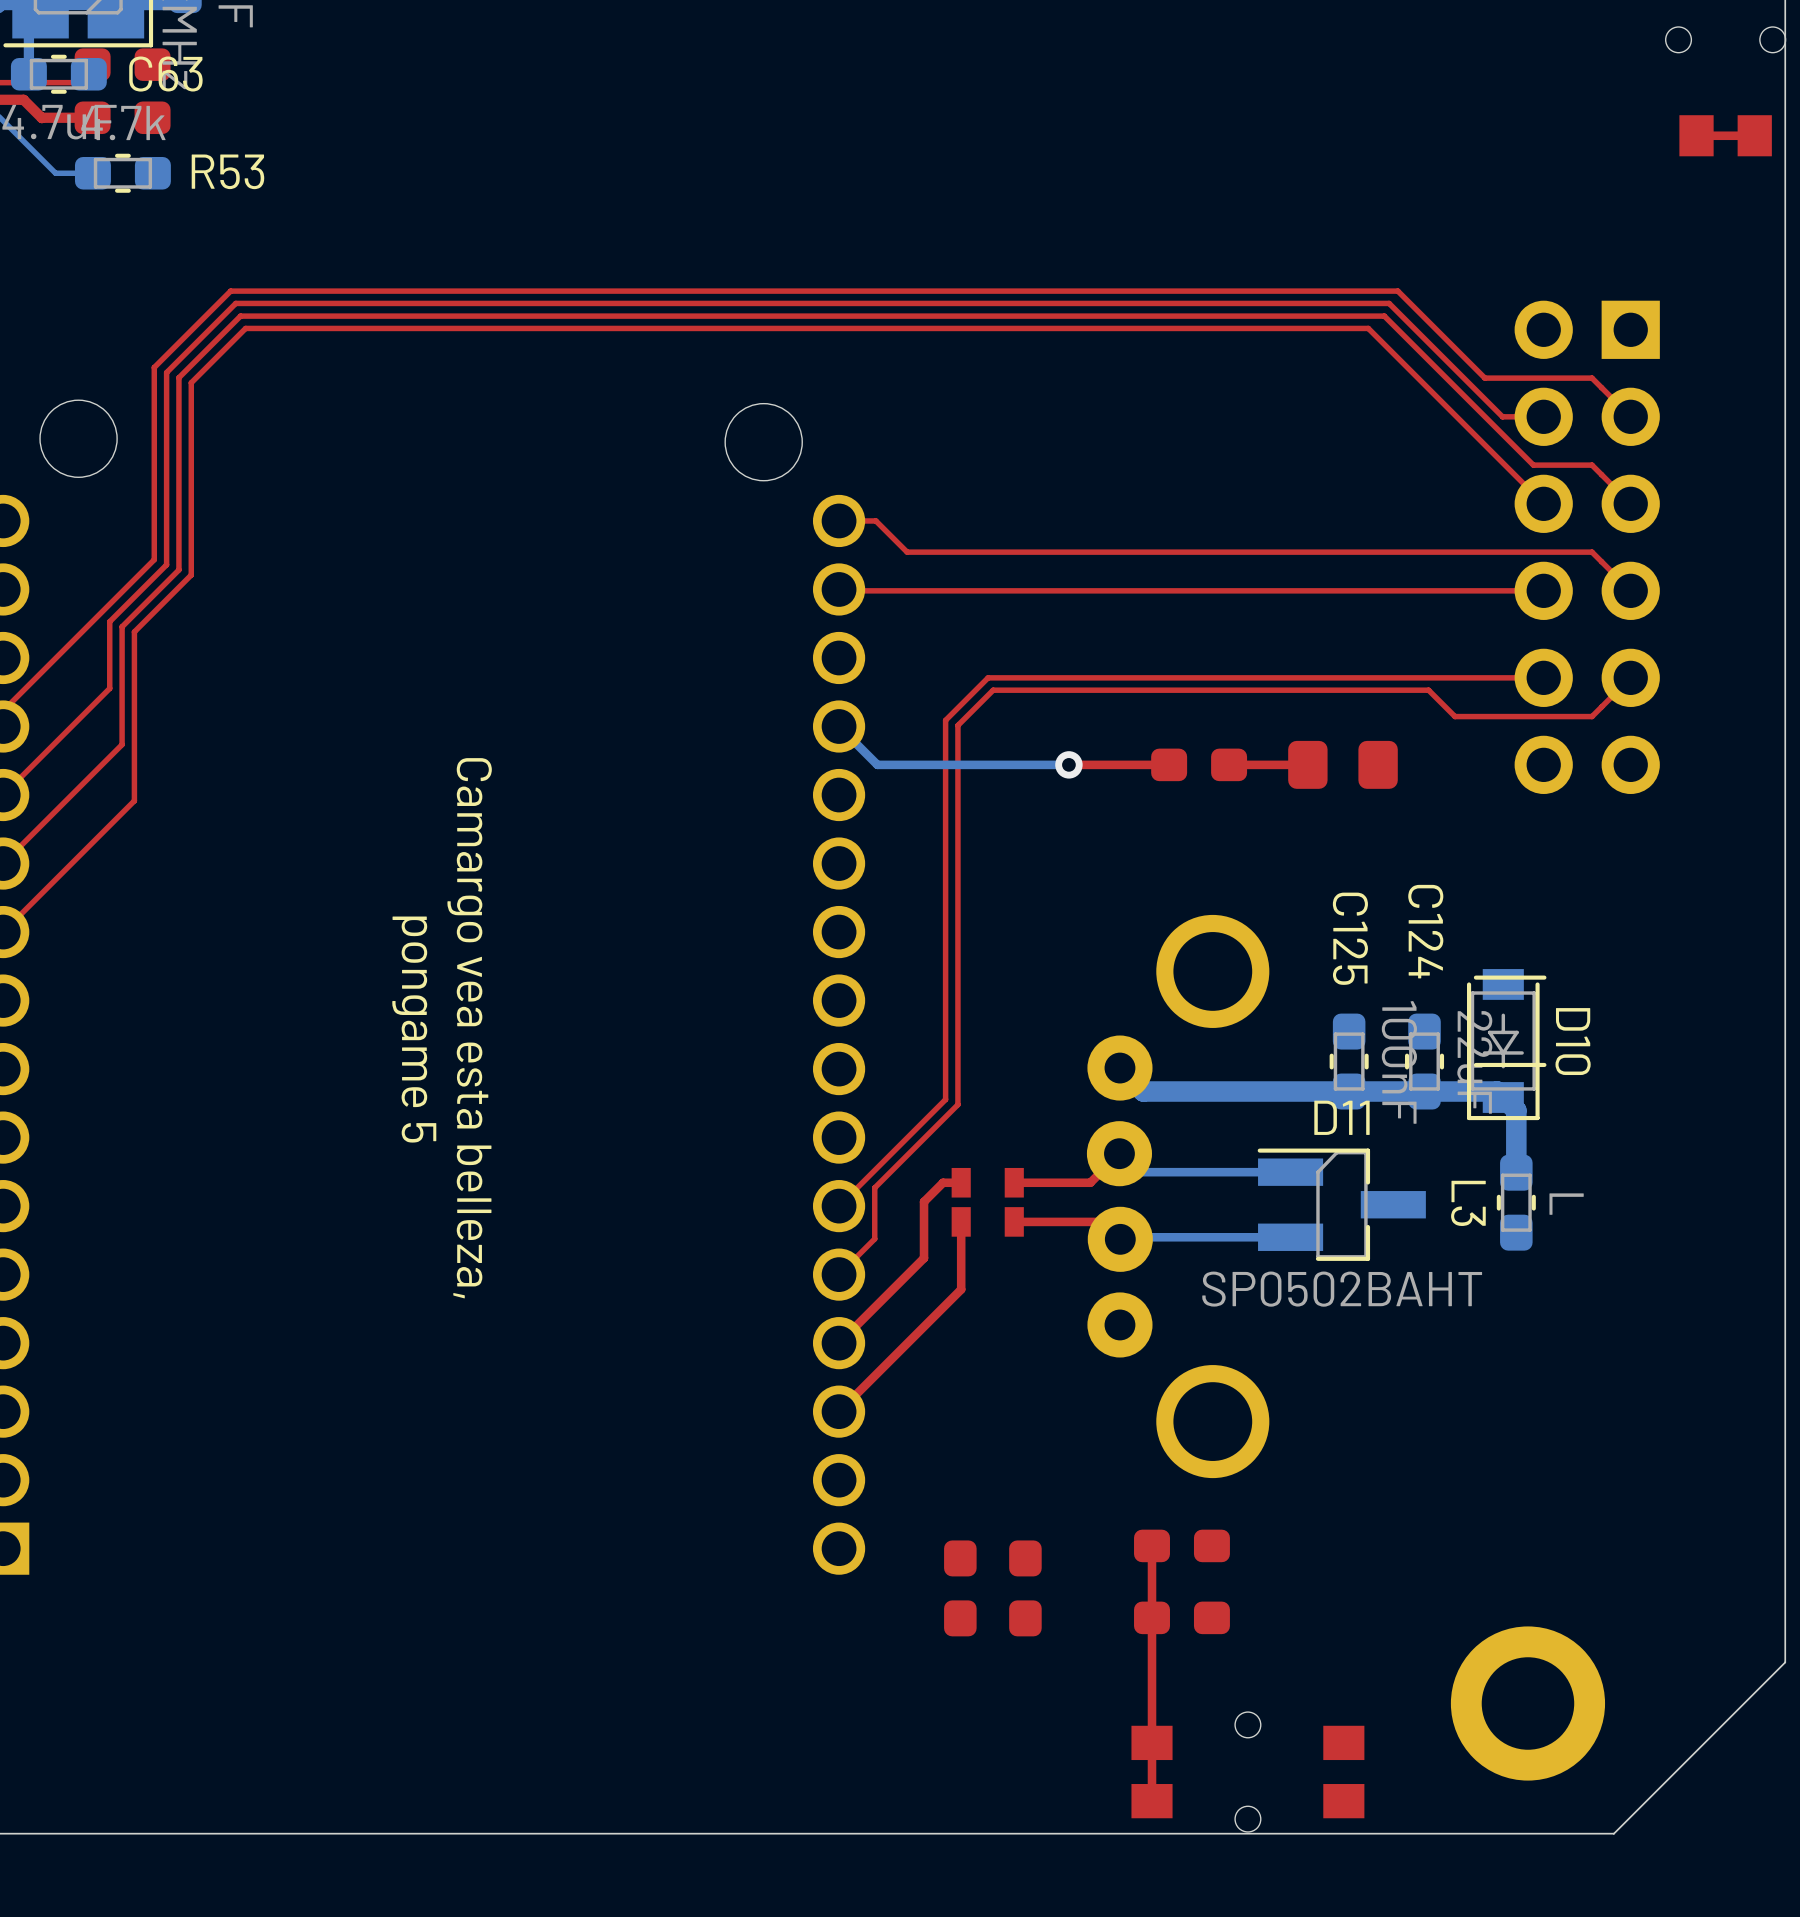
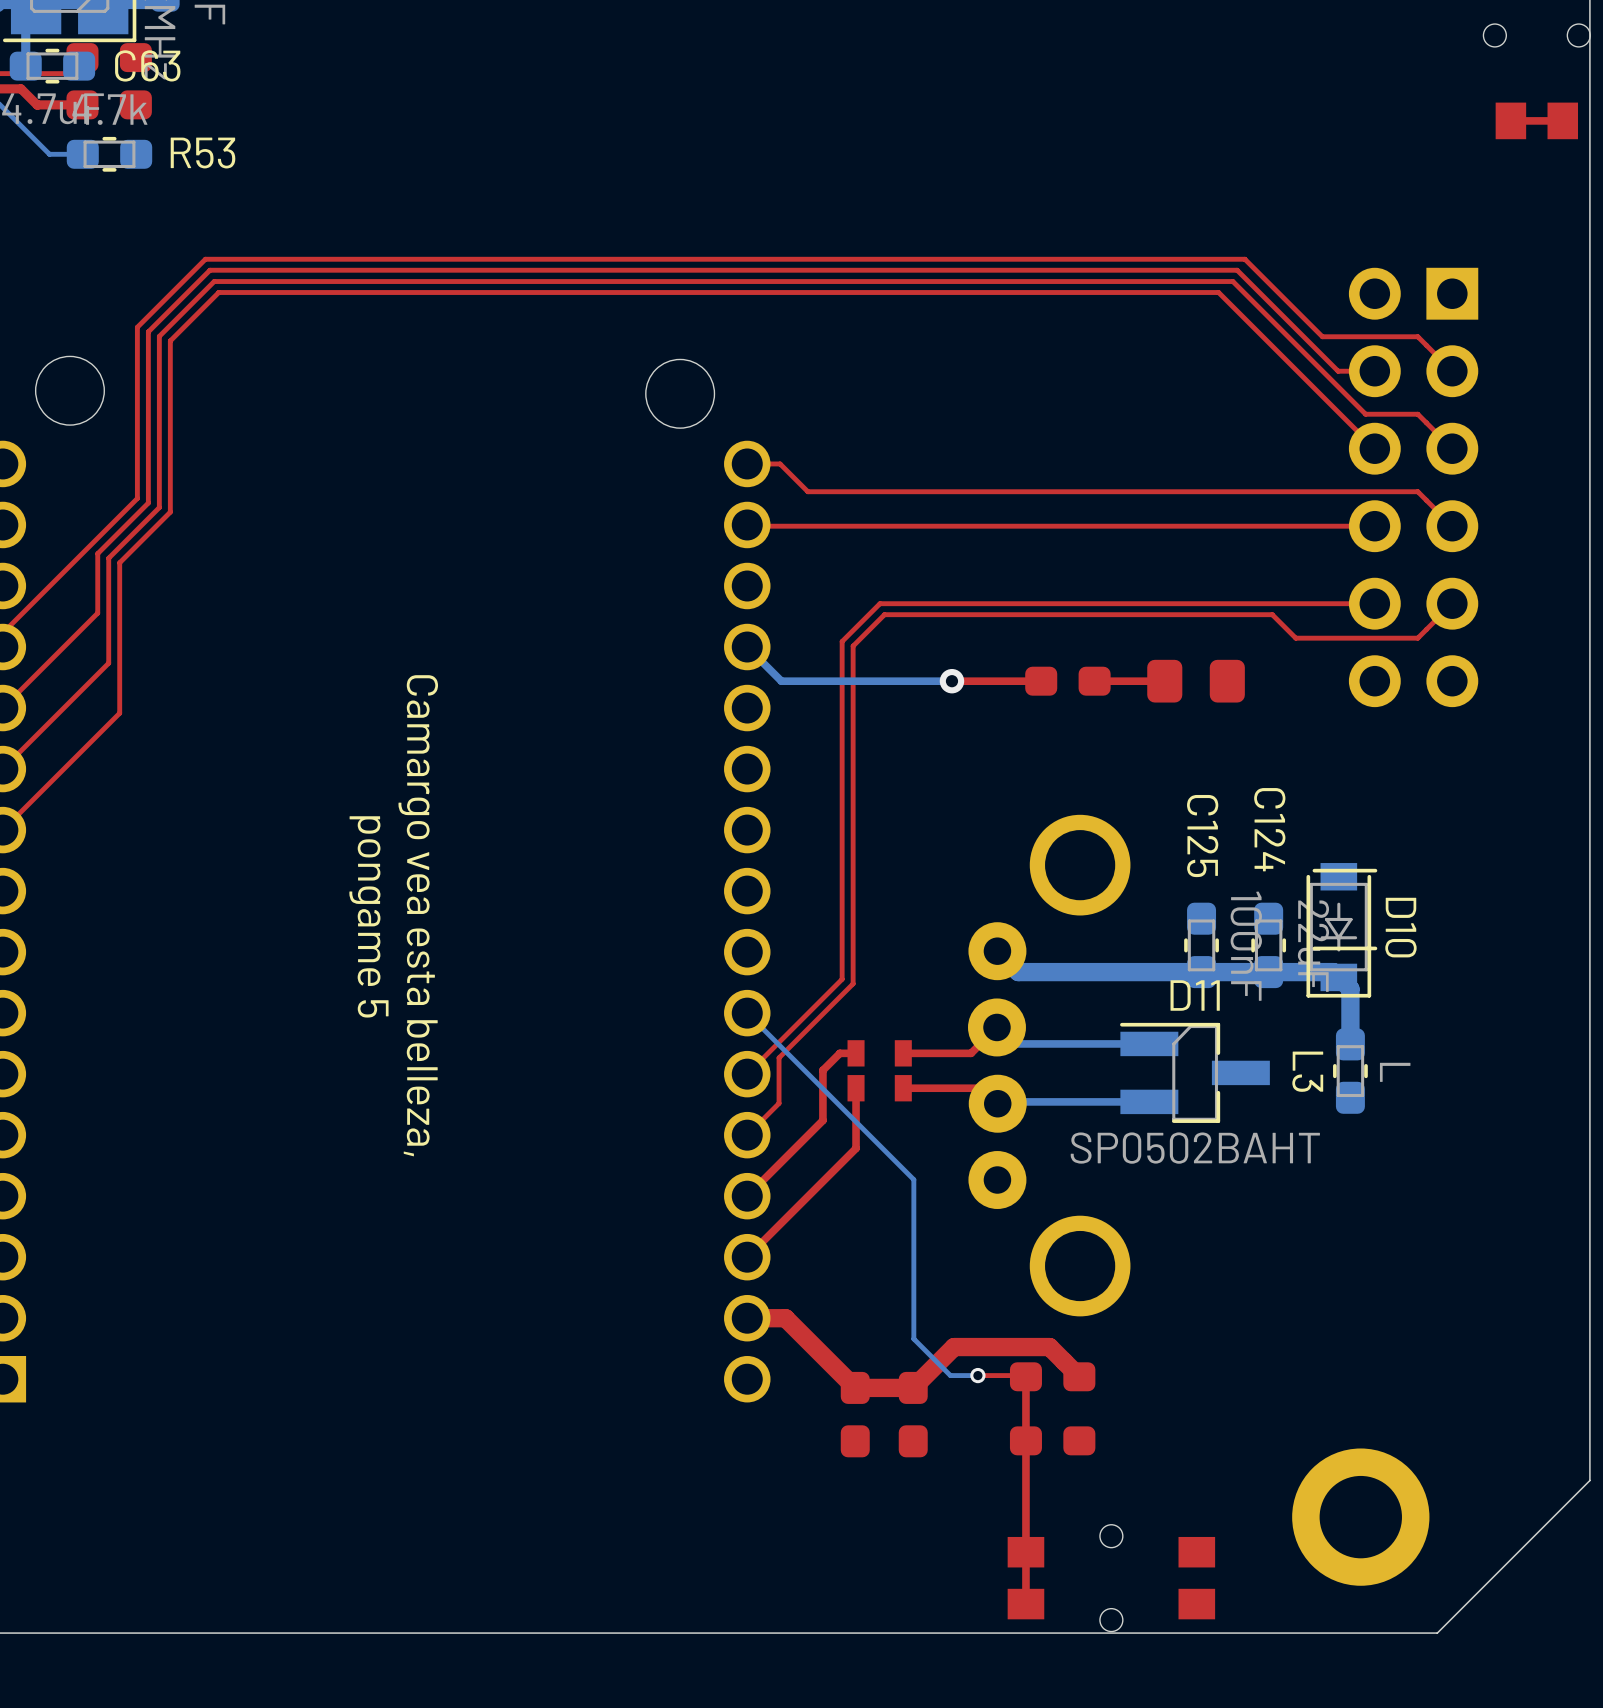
bottom track: none -> (747, 1013) (913, 1179) (913, 1338) (950, 1375) (977, 1375)
top track: none -> (747, 1318) (785, 1318) (855, 1387) (913, 1387) (954, 1347) (1049, 1347) (1079, 1376)
top track: none -> (977, 1375) (1025, 1376)
via: none -> (977, 1375)

